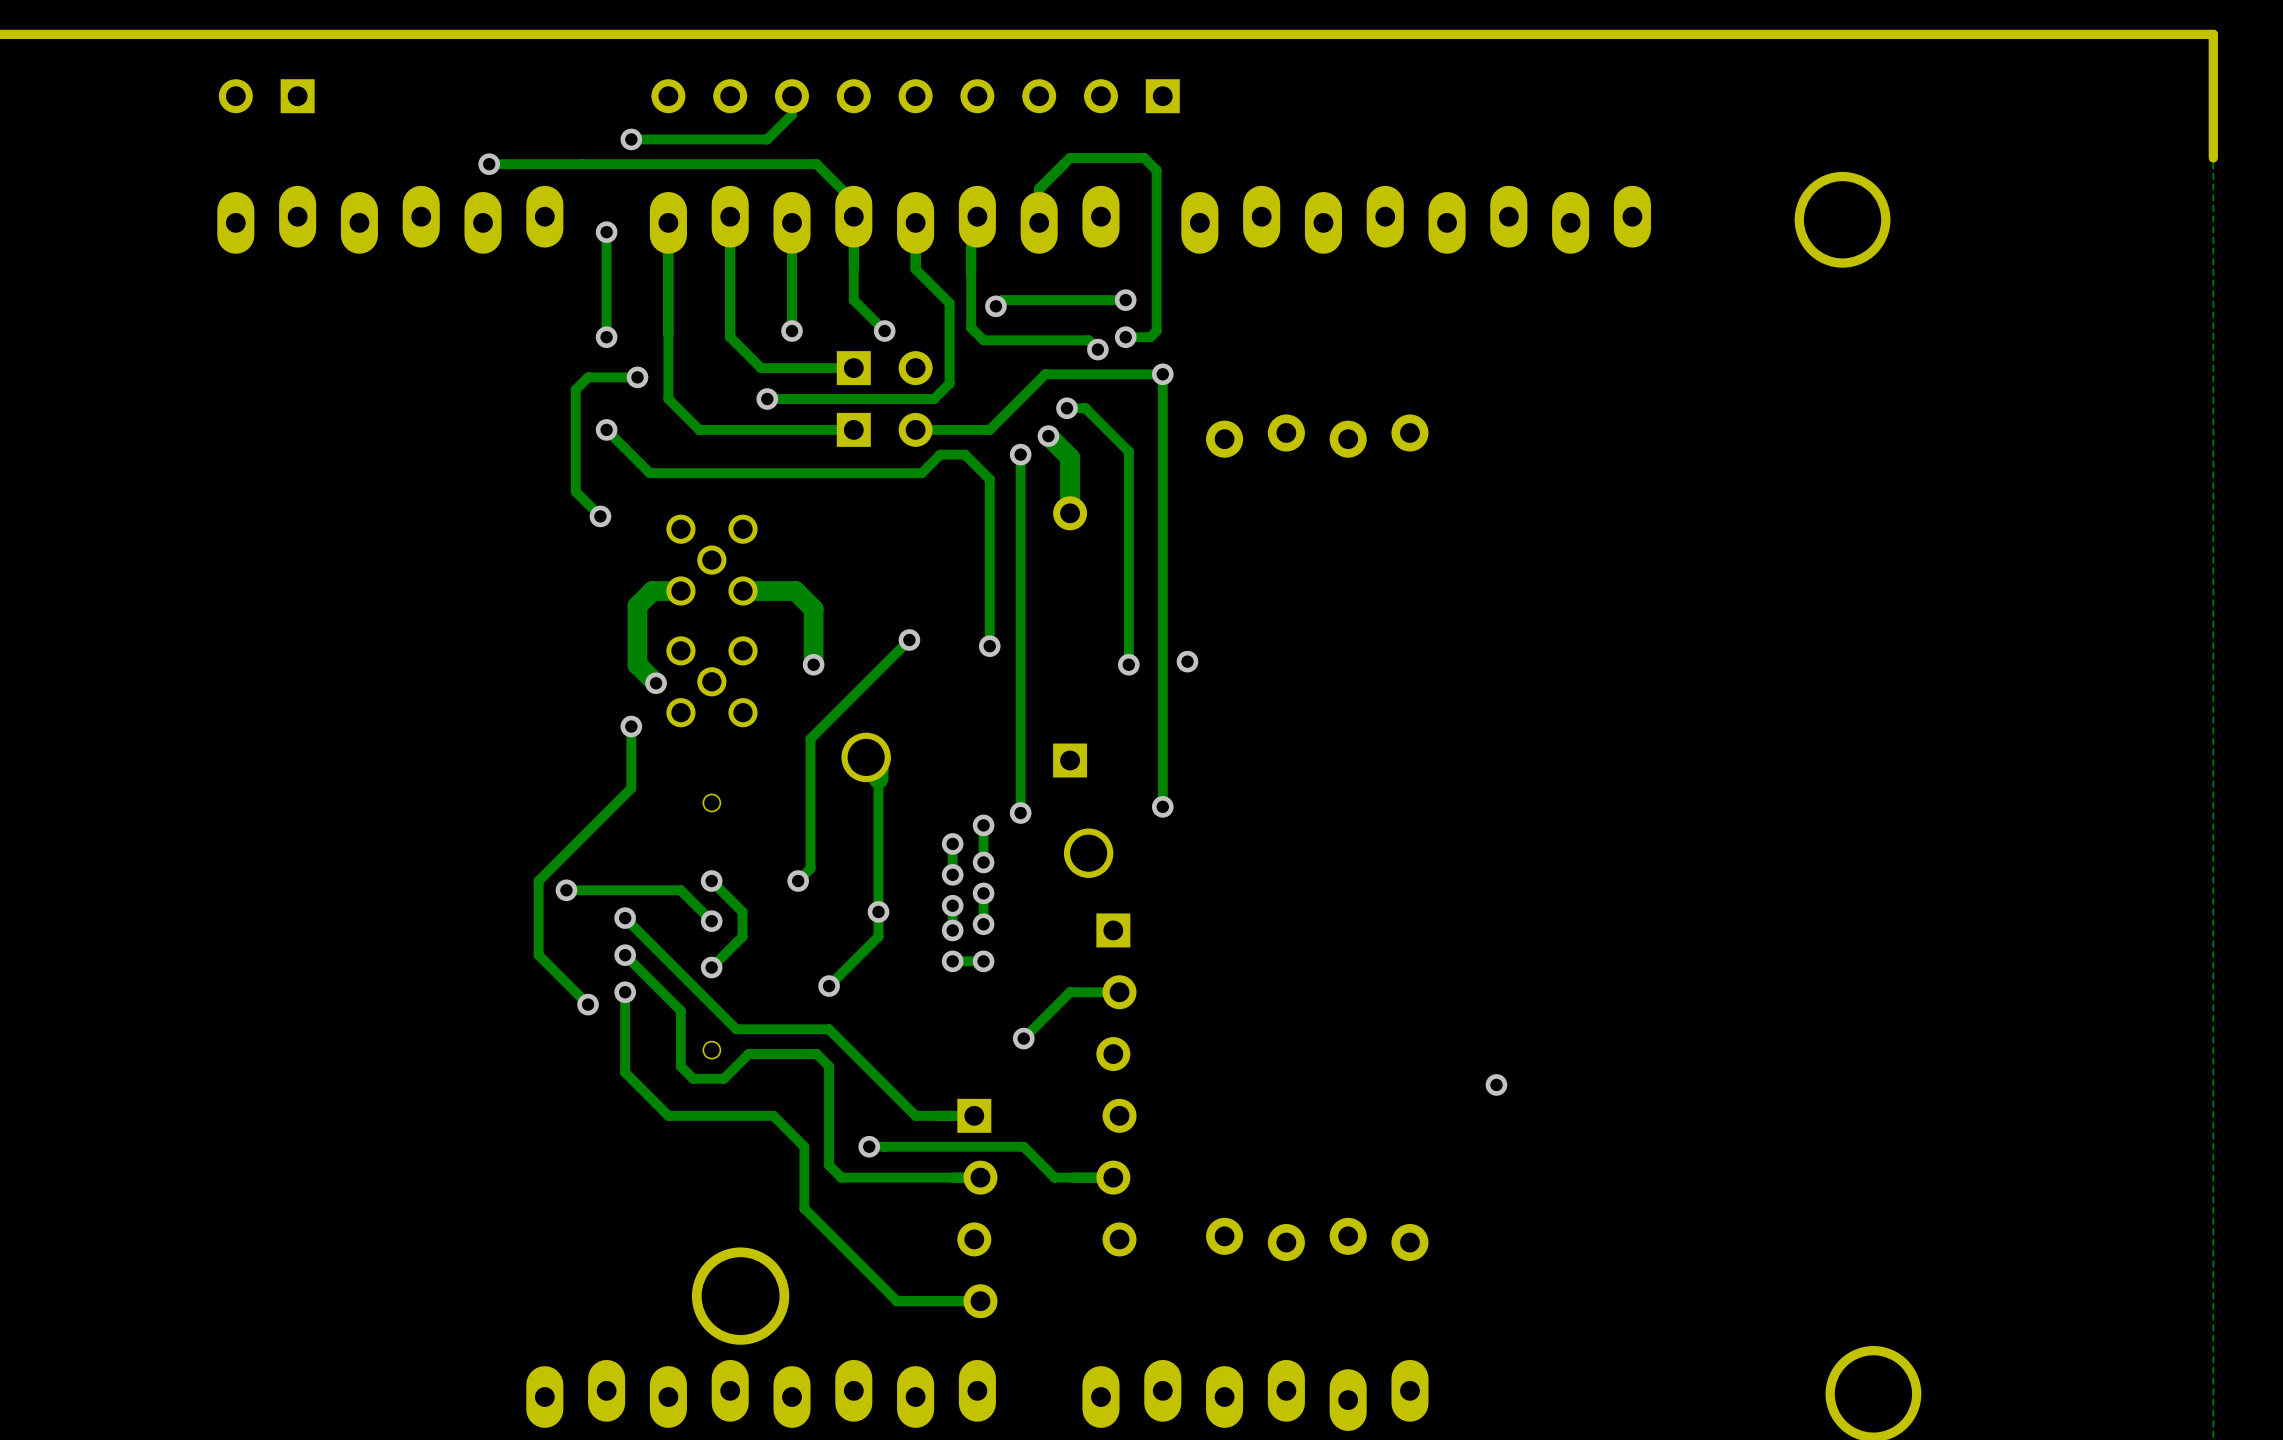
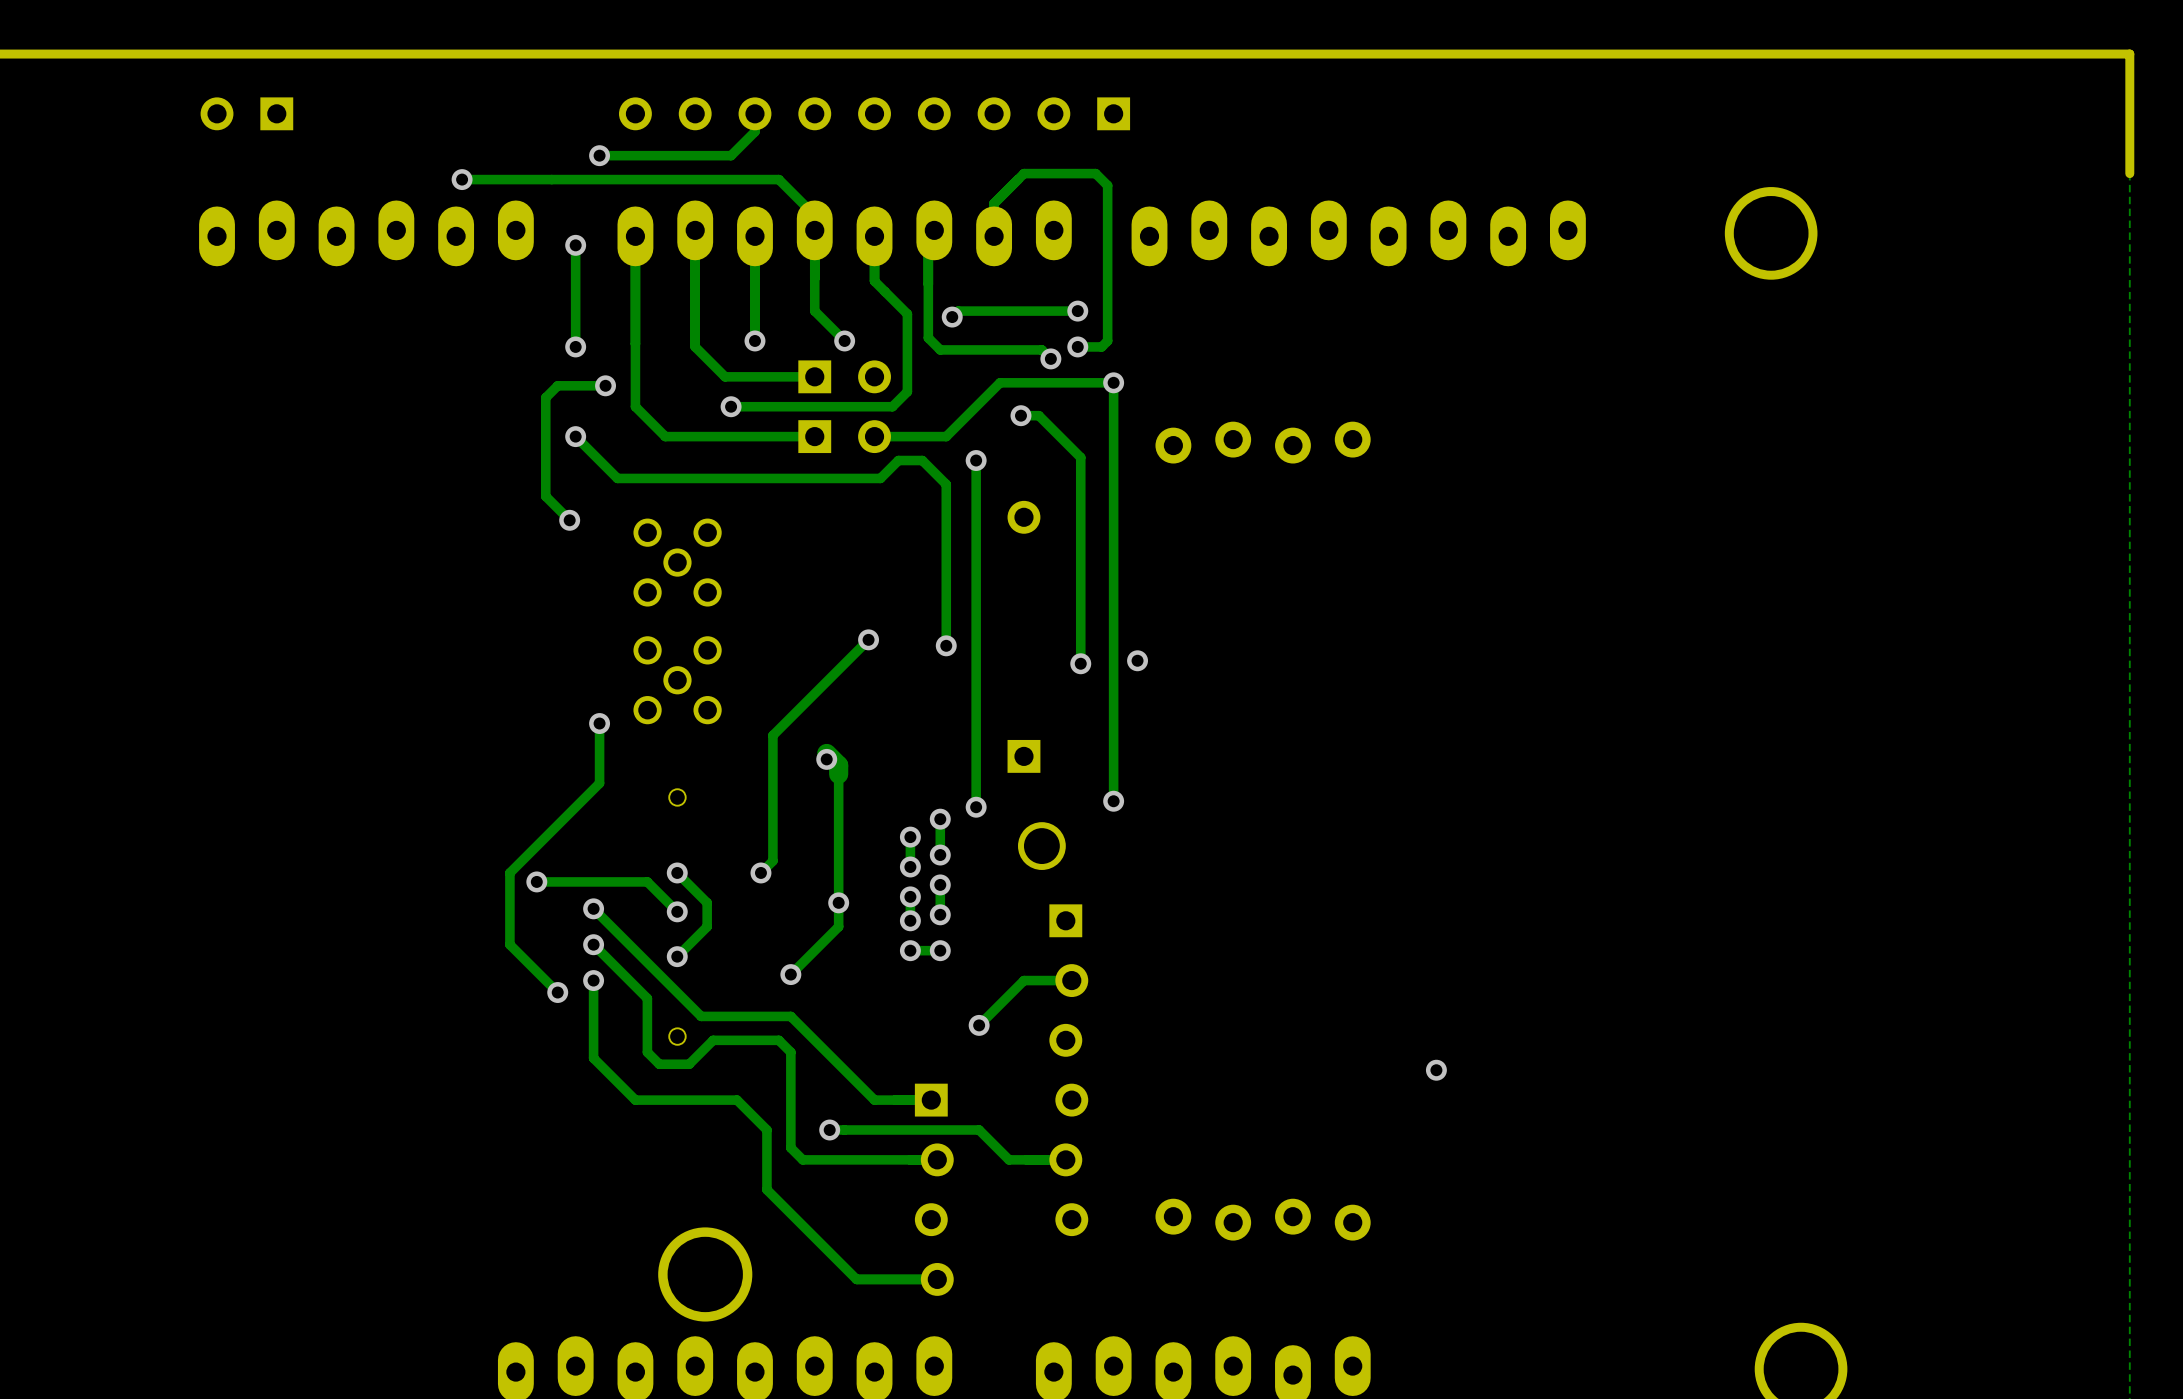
track: (1048, 436) (1070, 457) (1070, 513) -> none
via: (1048, 436) -> none
track: (680, 591) (652, 591) (637, 606) (637, 664) (656, 683) -> none
track: (743, 591) (795, 591) (813, 609) (813, 664) -> none
via position: (813, 664) -> (826, 759)
via: (656, 683) -> none
part: (866, 757) -> none

